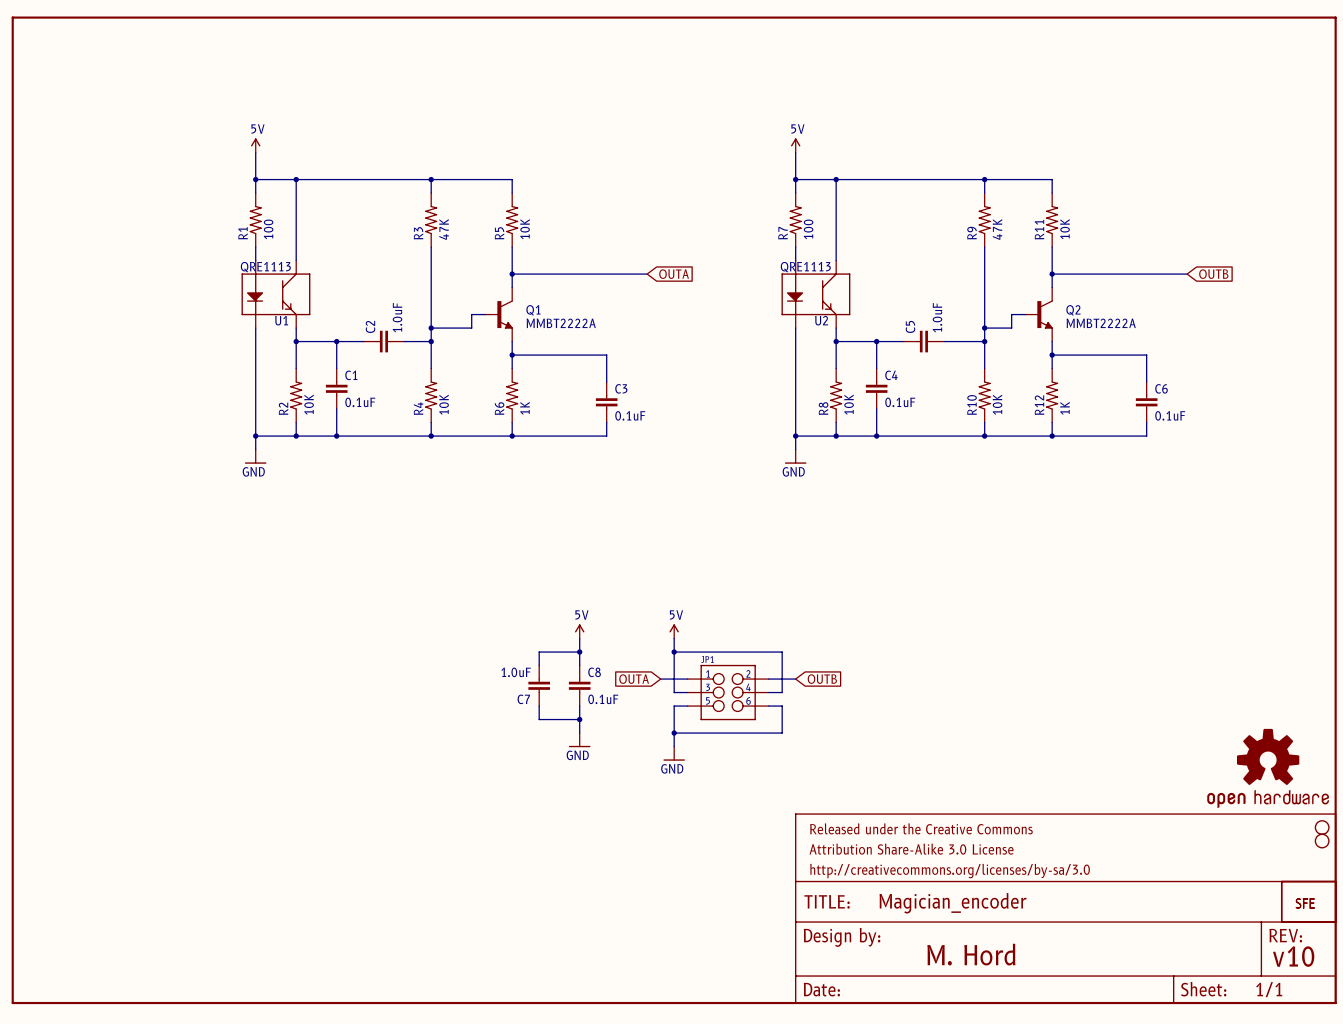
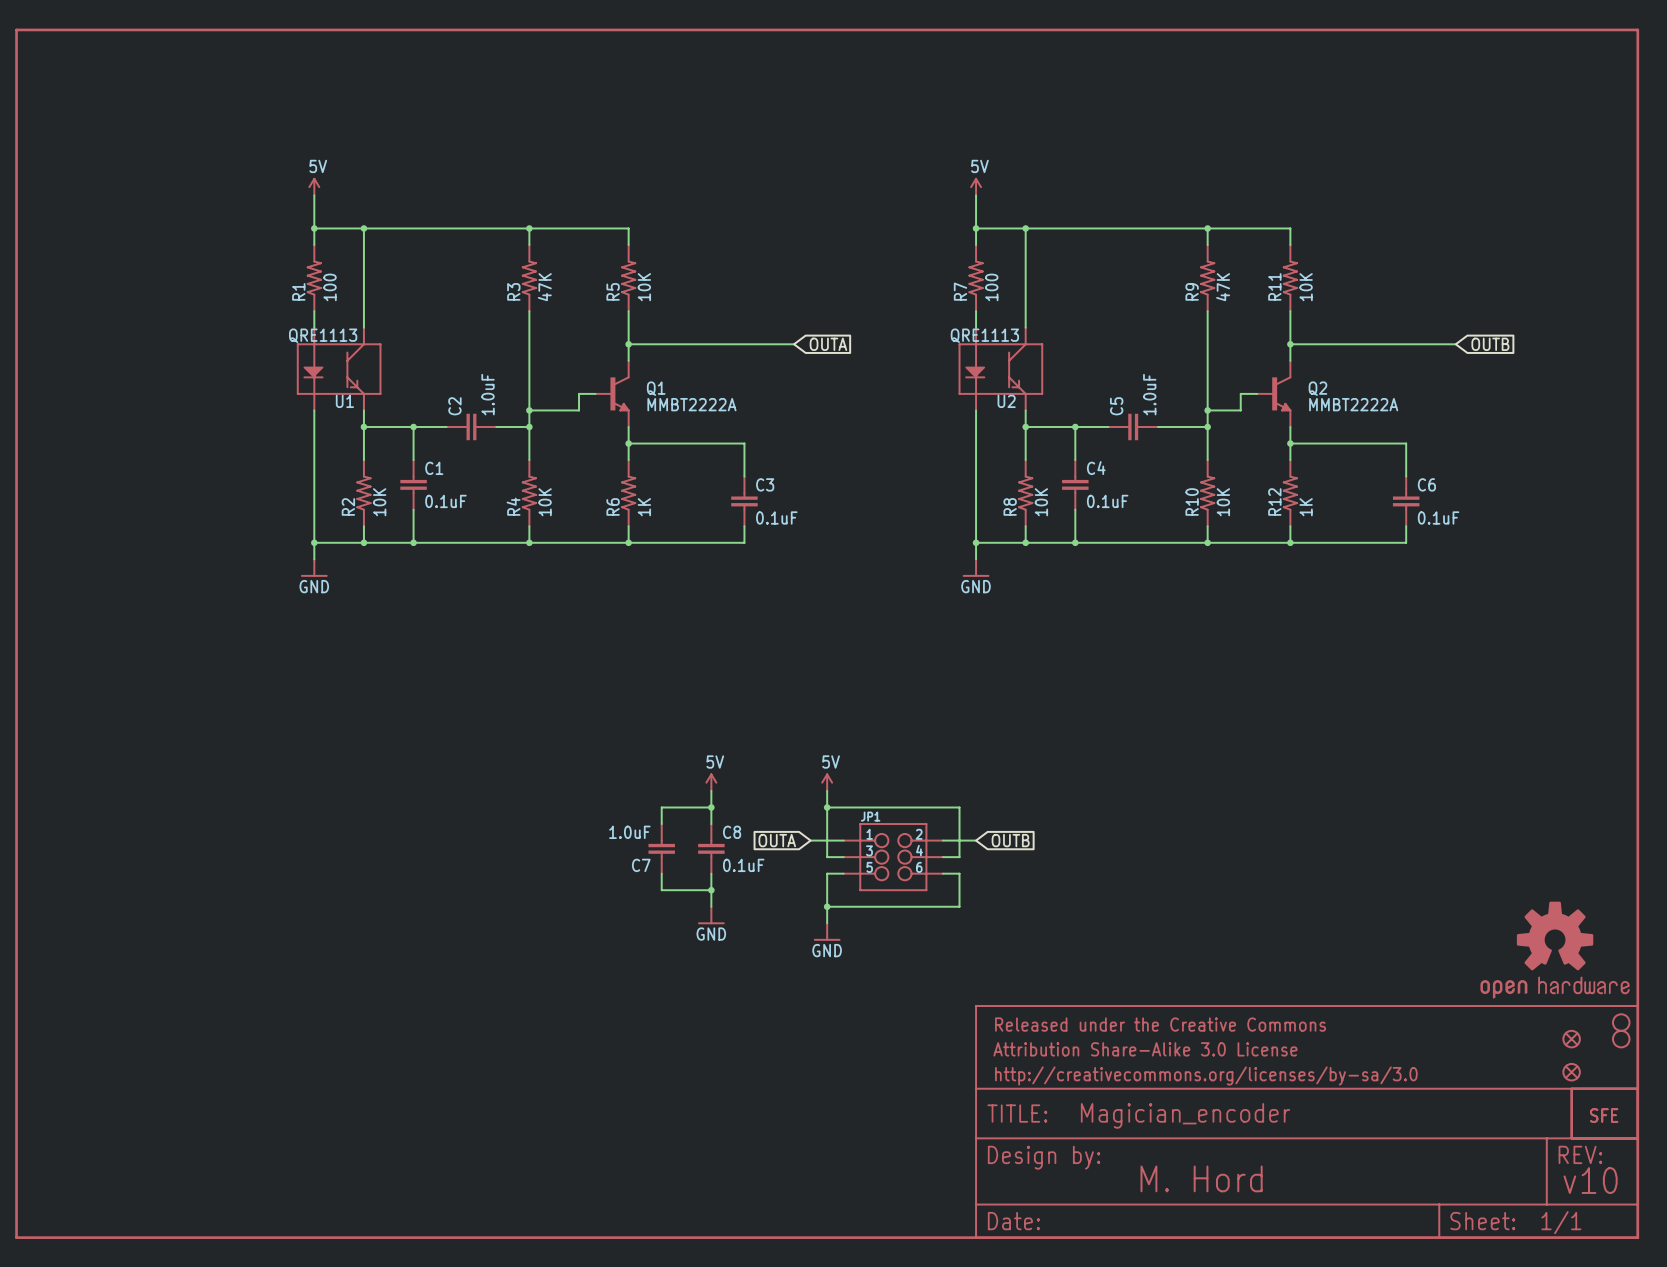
part: none -> (1571, 1039)
part: none -> (1571, 1072)

